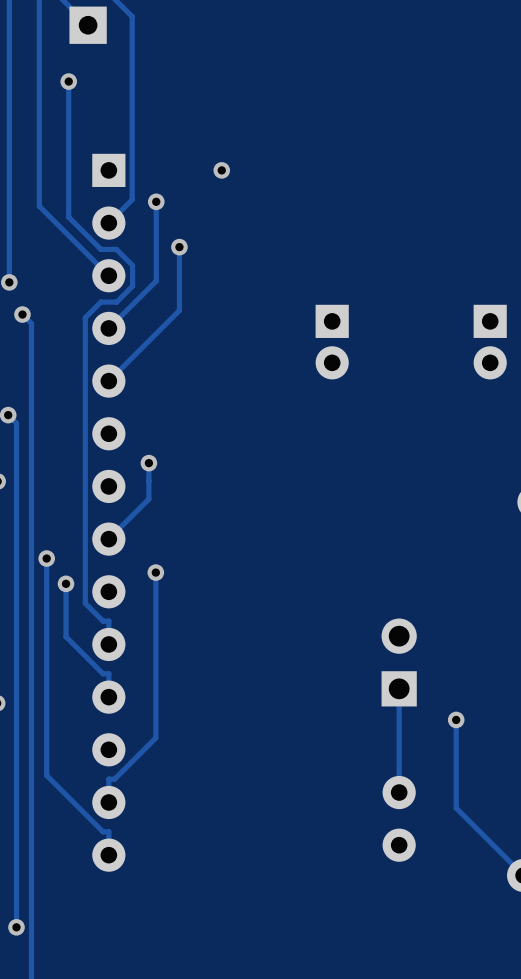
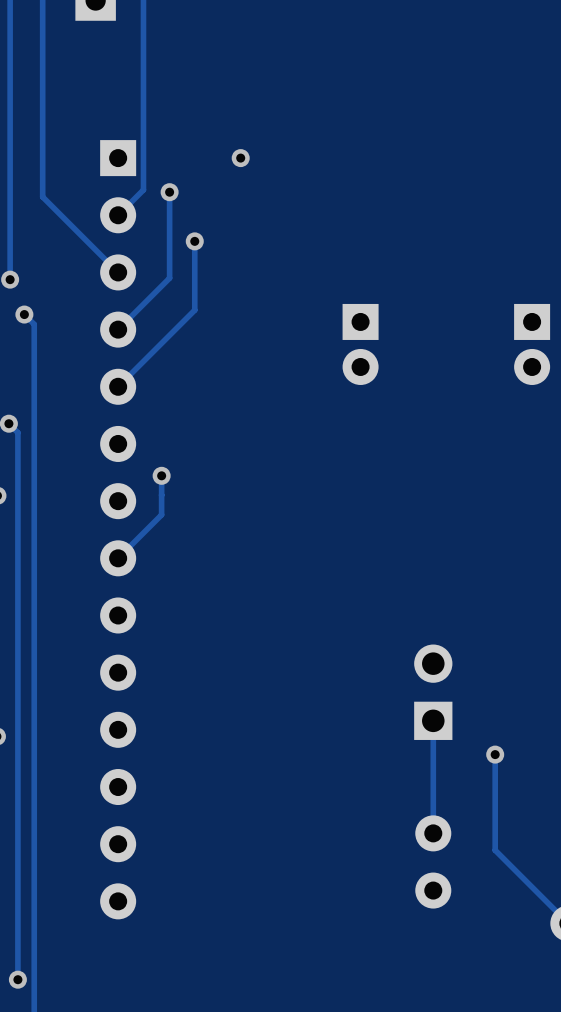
track: (68, 81) (68, 217) (100, 249) (116, 249) (132, 265) (132, 286) (116, 302) (100, 302) (85, 317) (85, 603) (103, 621) (108, 621) (108, 644) -> none
via: (68, 81) -> none
track: (46, 558) (46, 775) (103, 831) (108, 831) (108, 855) -> none
via: (46, 558) -> none
track: (155, 572) (155, 737) (114, 779) (108, 779) (108, 802) -> none
via: (155, 572) -> none
track: (66, 583) (66, 636) (103, 673) (108, 673) (108, 697) -> none
via: (66, 583) -> none

